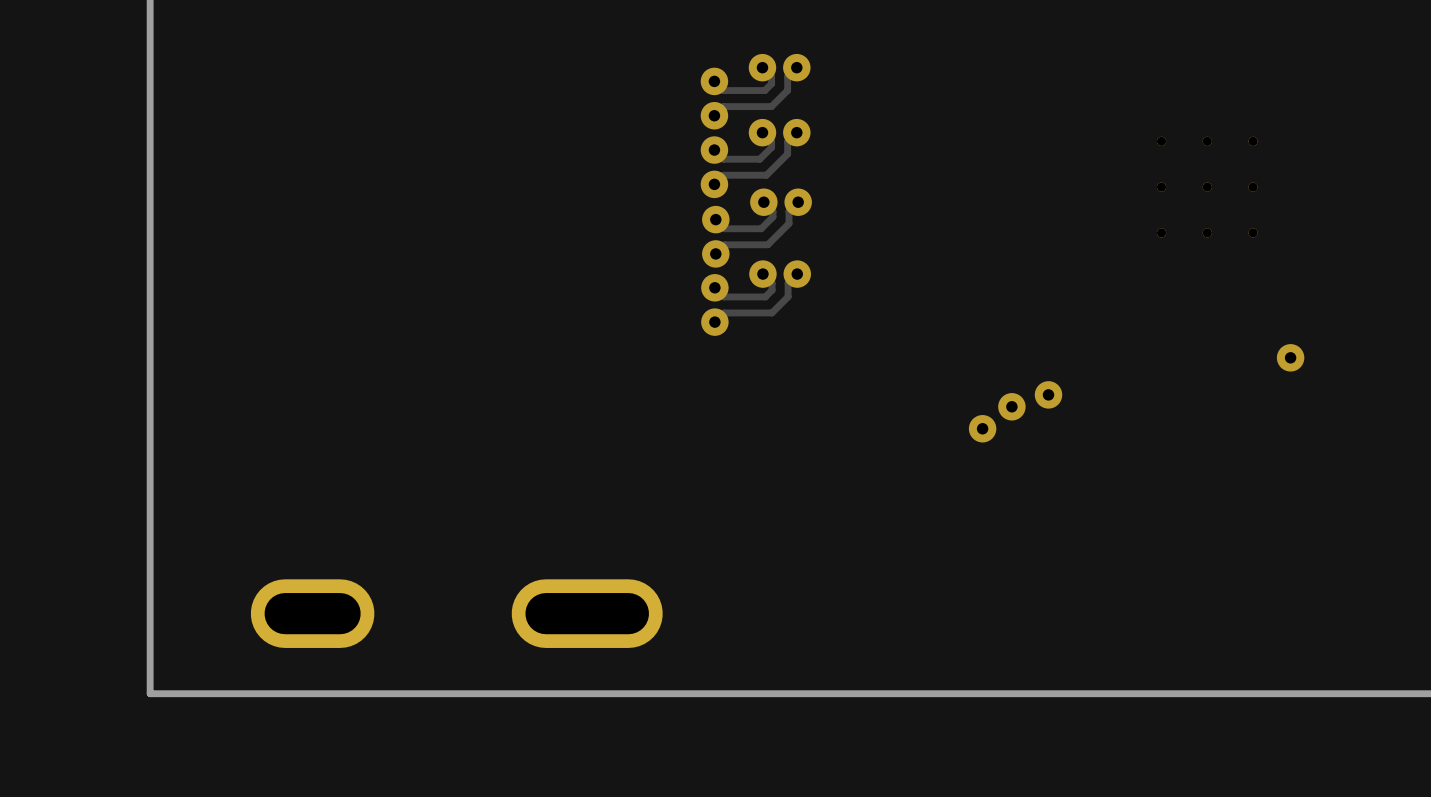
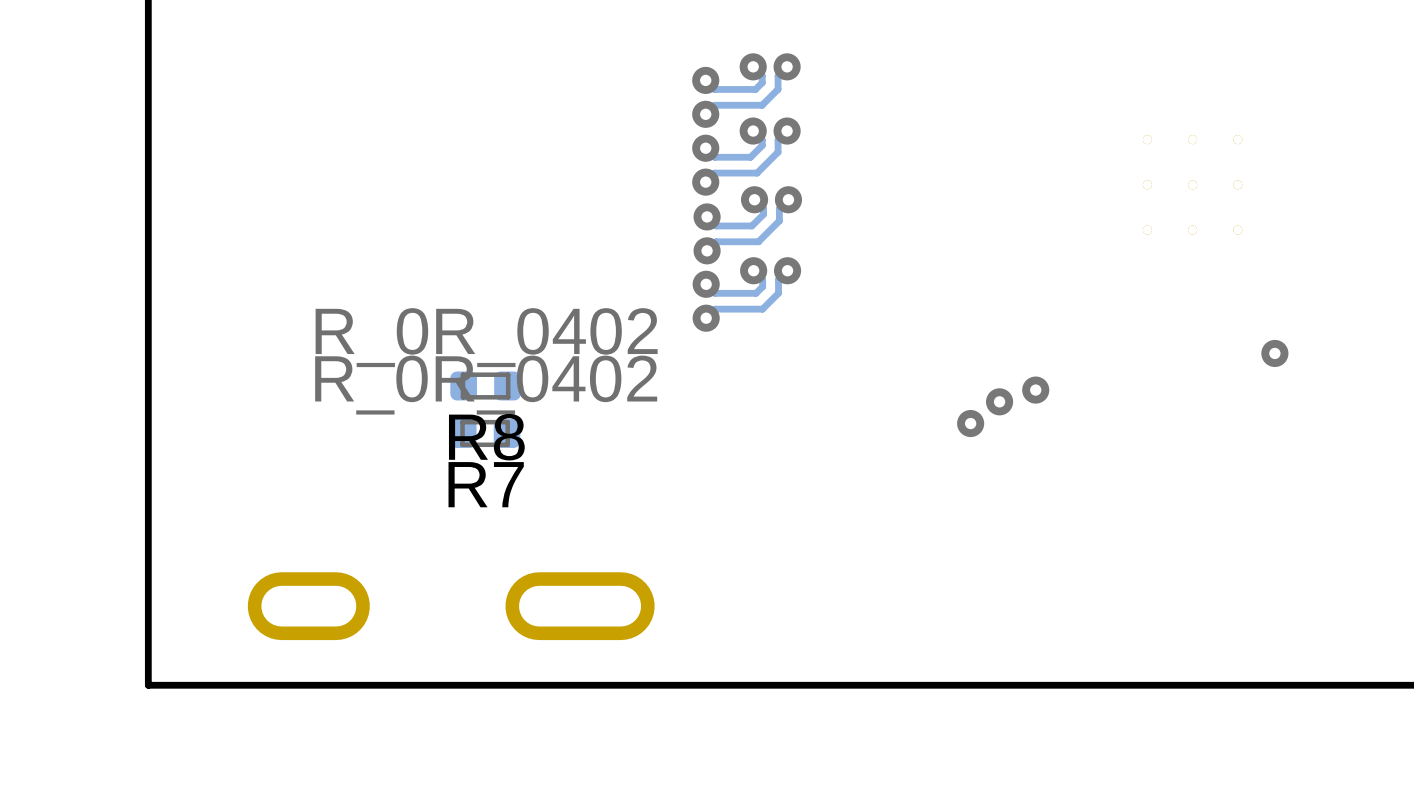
R8: none -> R_0R_0402 (485, 386)
R7: none -> R_0R_0402 (485, 433)

